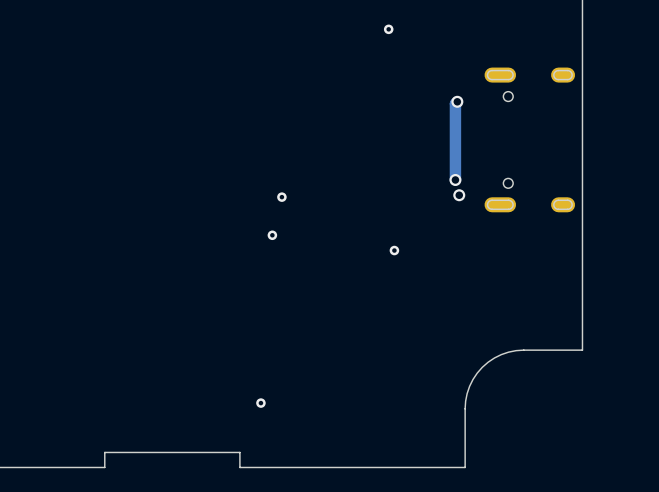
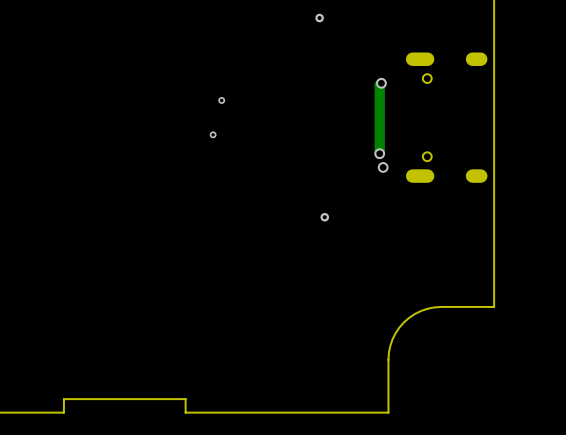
via: none -> (221, 100)
via: none -> (213, 134)
via: (281, 197) -> none
via: (272, 235) -> none
via: (260, 403) -> none

